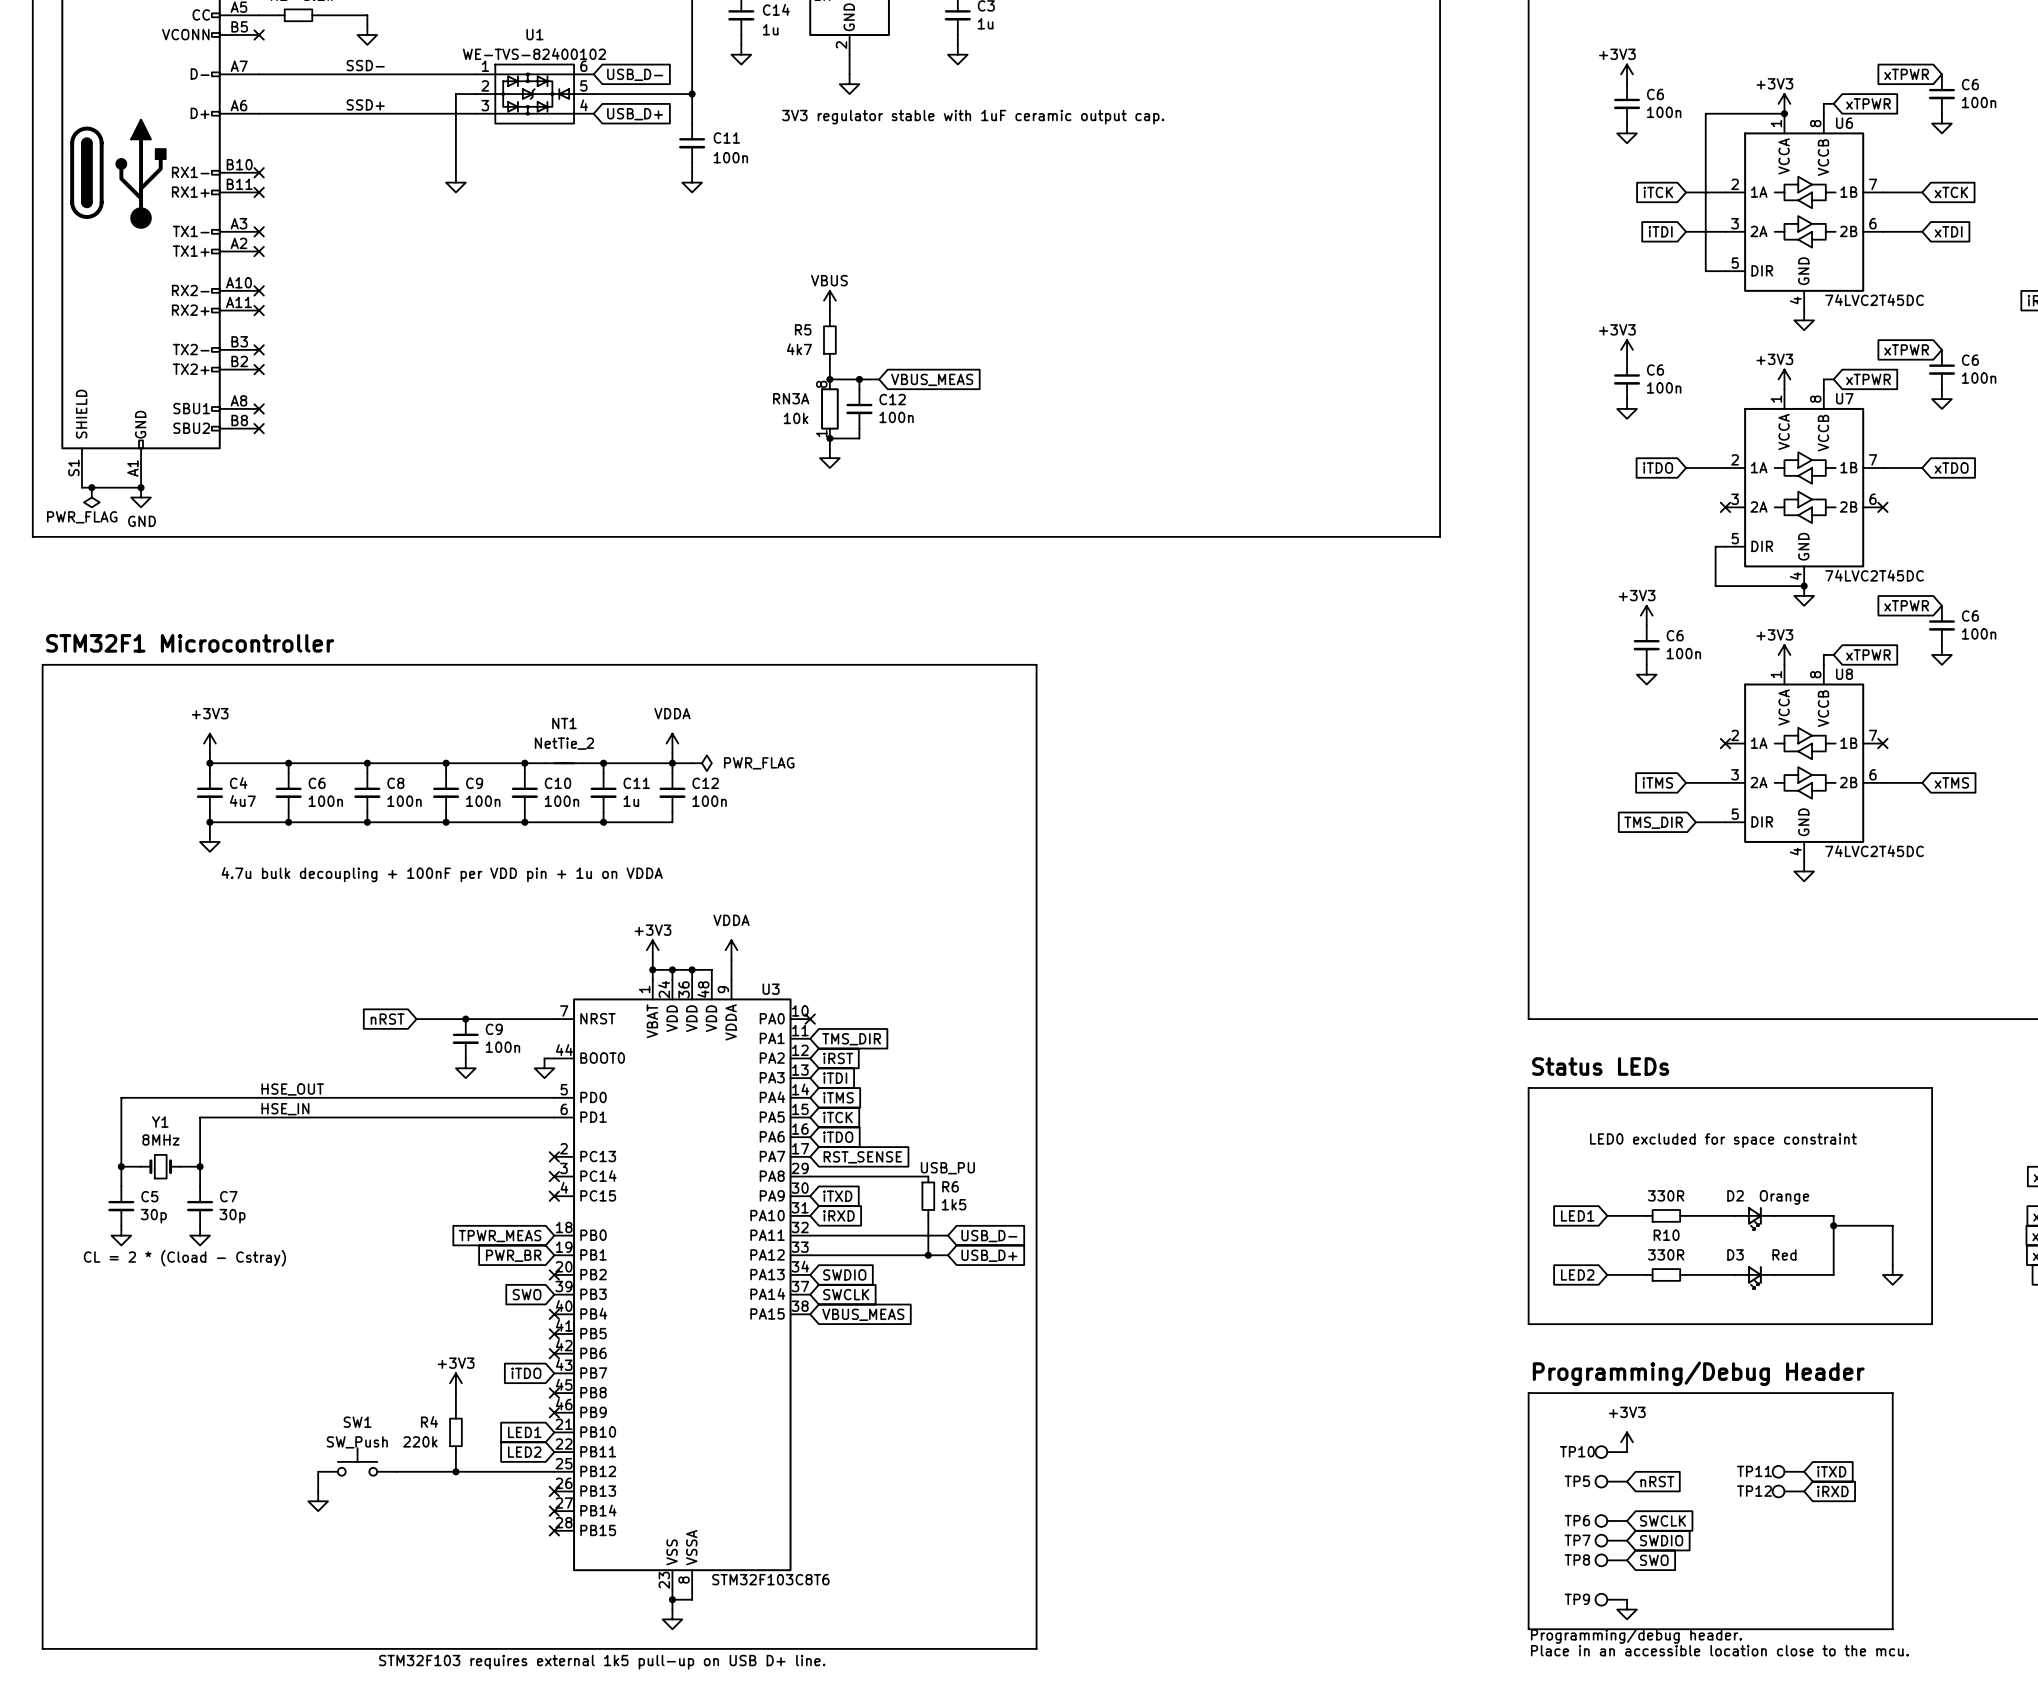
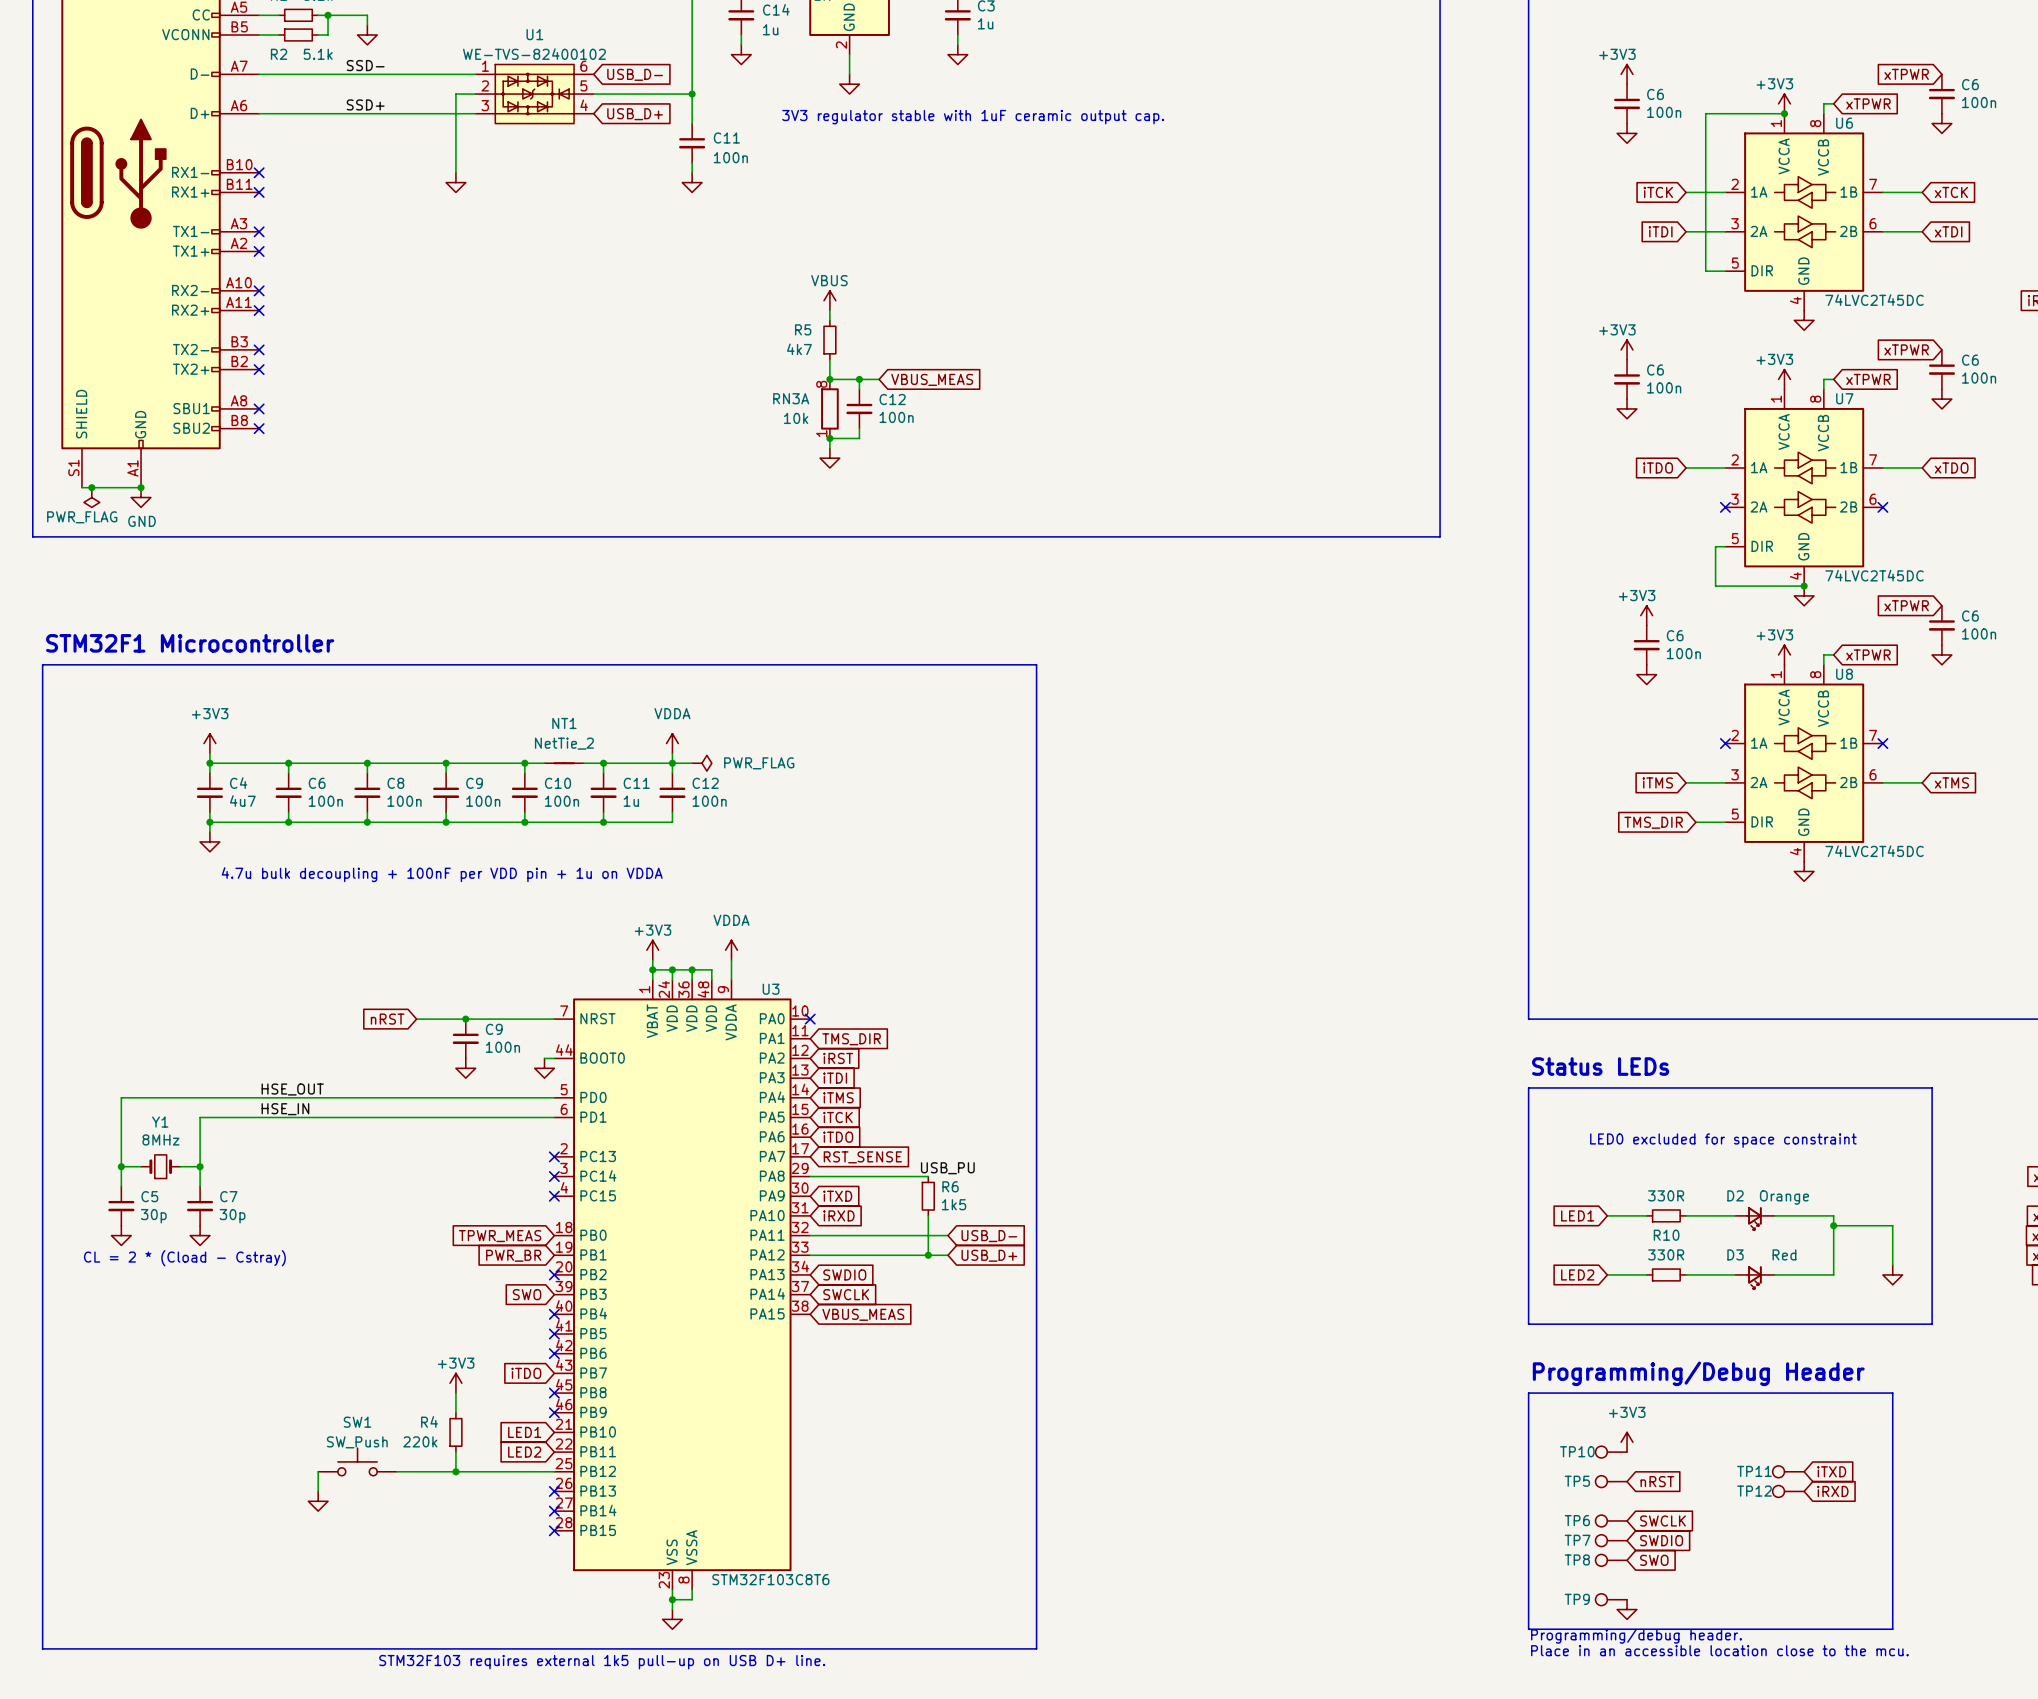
wire: none -> (328, 15) (328, 34) (318, 34)
junction: none -> (328, 15)
wire: none -> (259, 34) (278, 34)
no-connect mark: (259, 34) -> none
R2: none -> 5.1k (298, 34)

